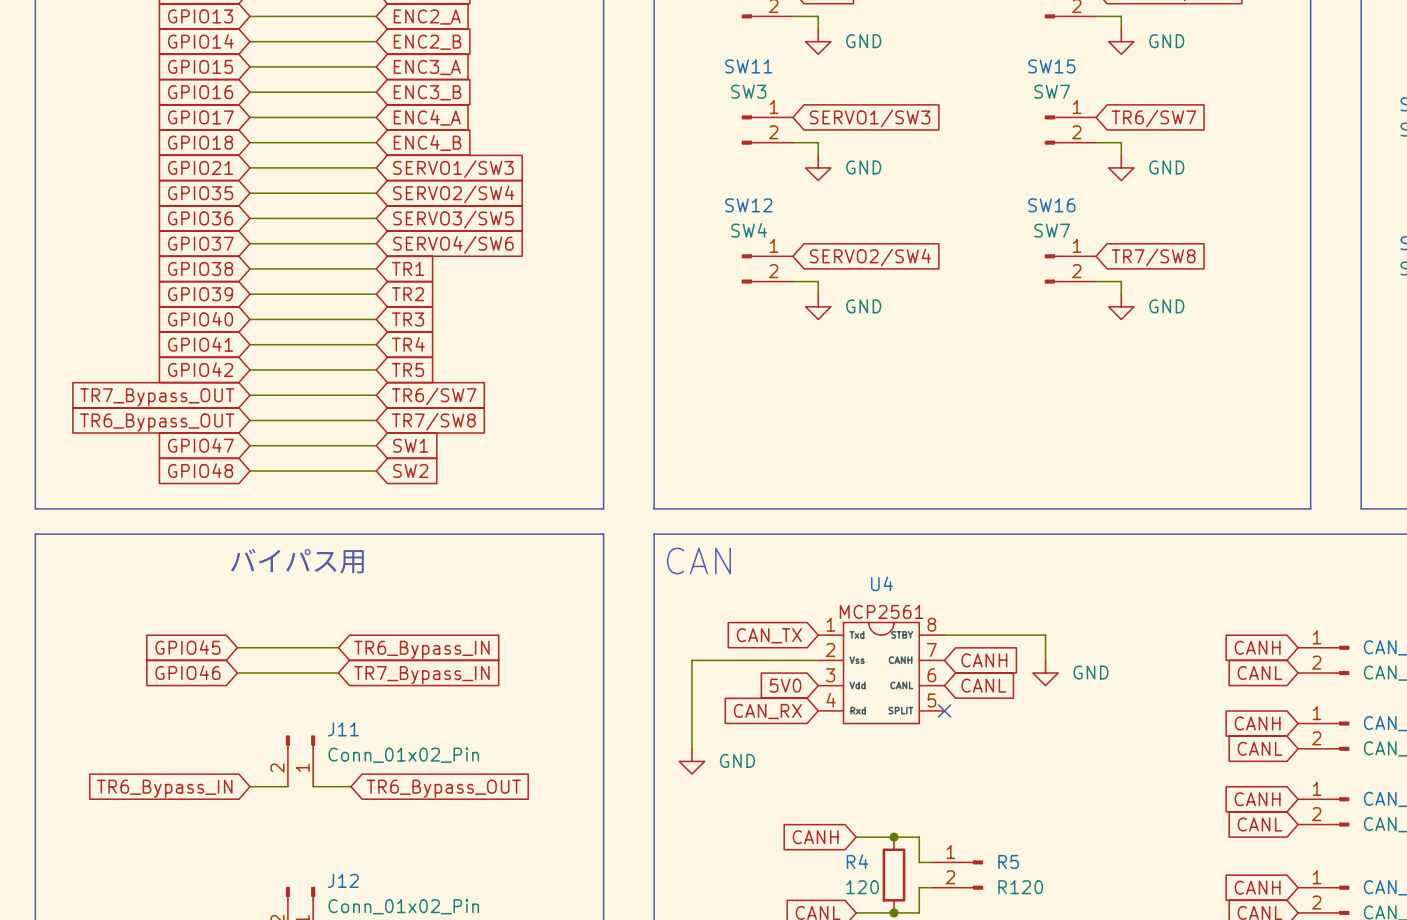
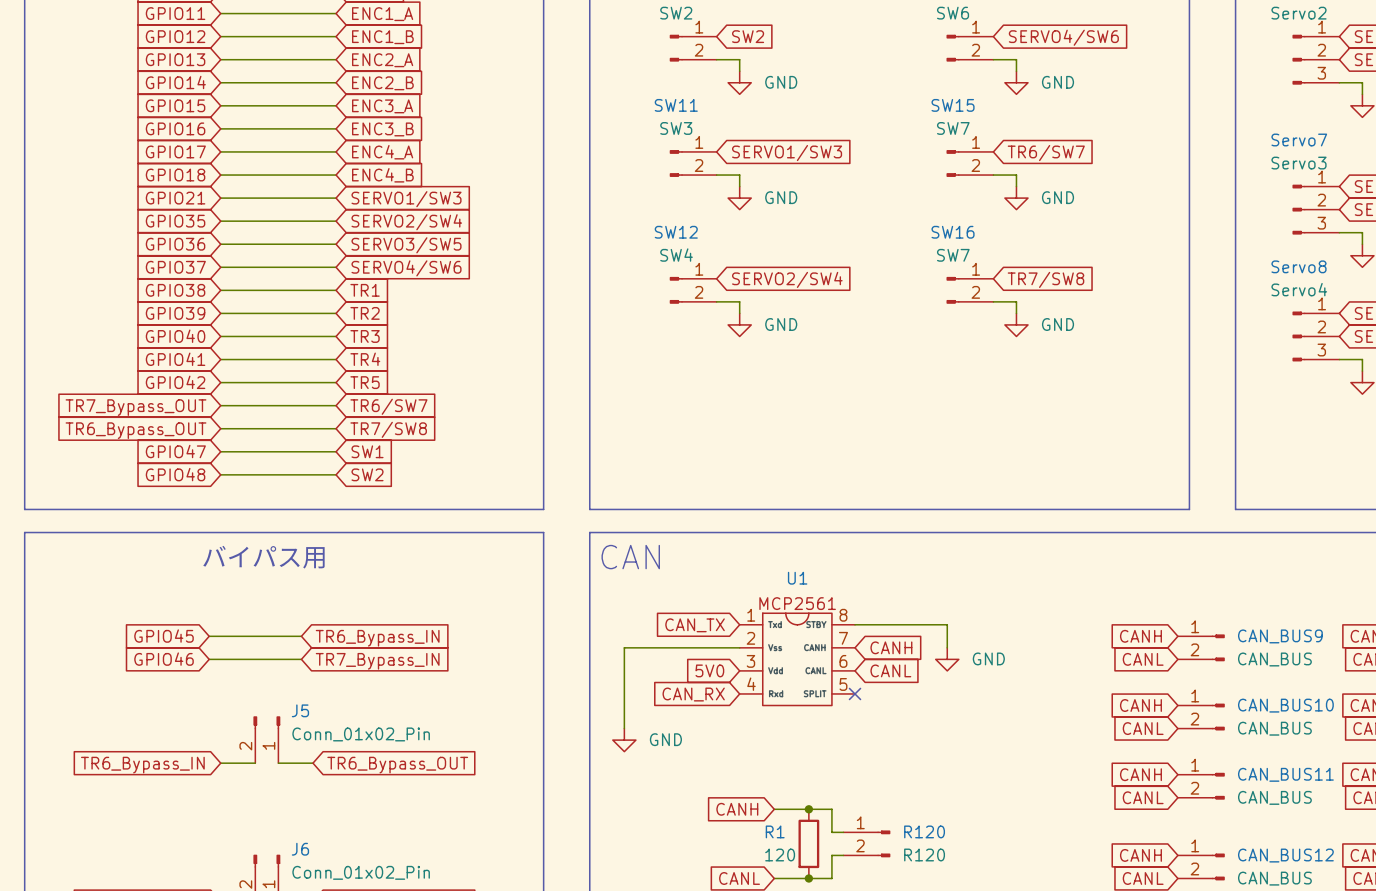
U4 name: U4 (881, 583) -> U1 (797, 578)
J11 name: J11 (343, 729) -> J5 (300, 710)
R4 name: R4 (857, 861) -> R1 (775, 831)
R5 name: R5 (1008, 861) -> R120 (924, 831)
J12 name: J12 (343, 880) -> J6 (300, 849)

